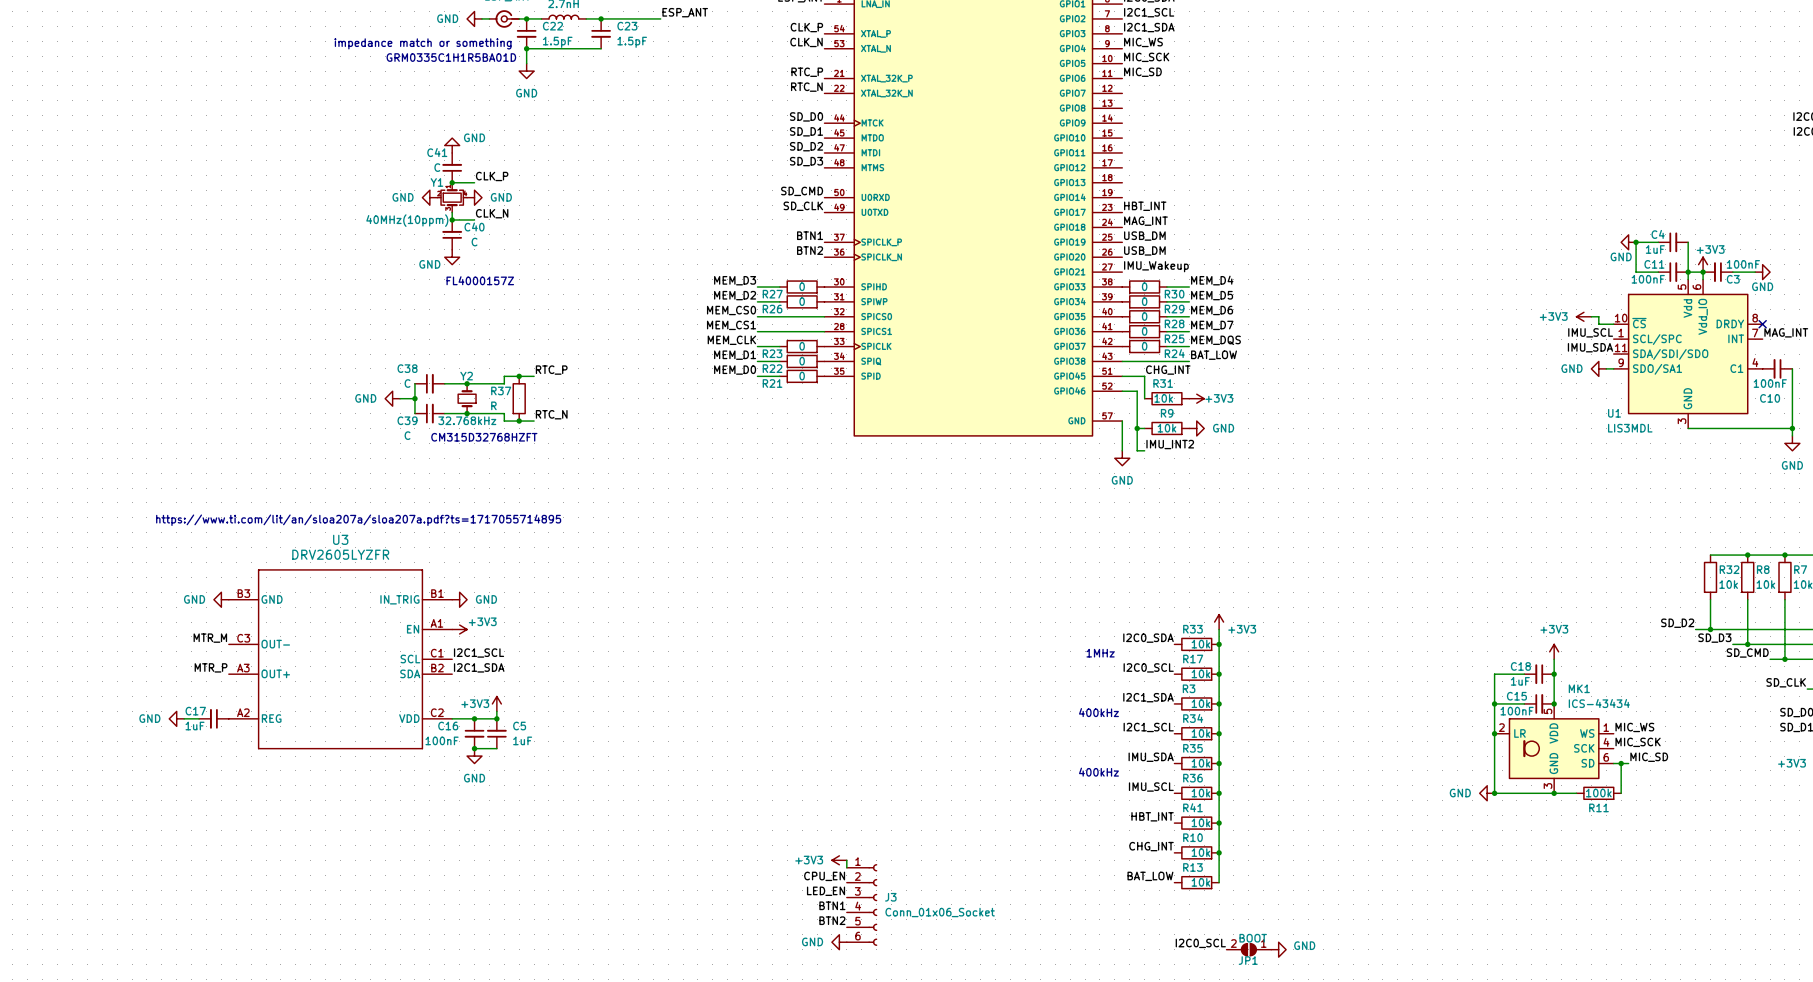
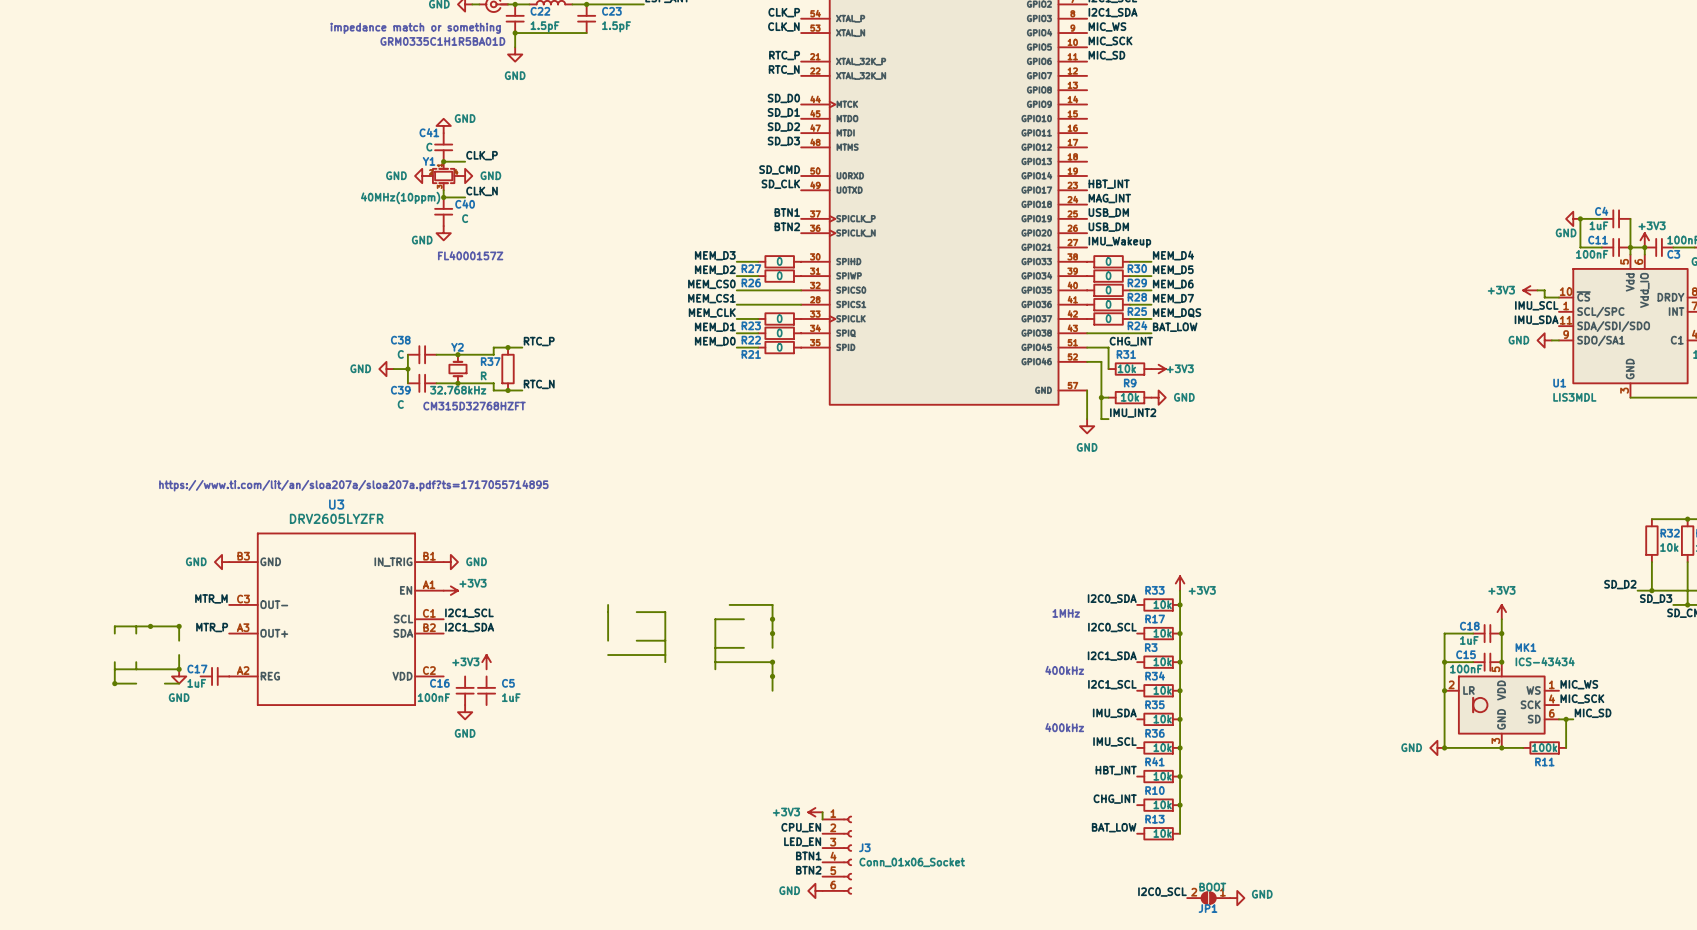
wire: none -> (608, 604) (608, 640)
wire: none -> (729, 604) (772, 604) (772, 647)
wire: none -> (636, 612) (665, 612) (665, 662)
wire: none -> (743, 619) (715, 619) (715, 669)
junction: none -> (772, 619)
wire: none -> (136, 626) (136, 633)
junction: none -> (150, 626)
junction: none -> (179, 626)
wire: none -> (114, 633) (114, 626) (179, 626) (179, 640)
junction: none -> (772, 633)
wire: none -> (636, 640) (665, 640)
wire: none -> (715, 647) (743, 647)
wire: none -> (179, 655) (179, 669) (114, 669)
wire: none -> (608, 655) (665, 655)
wire: none -> (114, 662) (114, 683) (136, 683)
wire: none -> (136, 662) (136, 669)
wire: none -> (715, 662) (772, 662) (772, 690)
junction: none -> (772, 662)
junction: none -> (179, 669)
wire: (496, 711) (496, 718) (452, 718) -> none
power symbol rotation: 0° (176, 718) -> 90° counterclockwise (179, 676)
wire: (184, 718) (199, 718) -> (164, 683) (179, 683)
junction: (474, 718) -> none
junction: (496, 718) -> none
junction: none -> (772, 676)
junction: none -> (114, 683)
wire: (474, 748) (496, 748) -> none
junction: (474, 748) -> none

